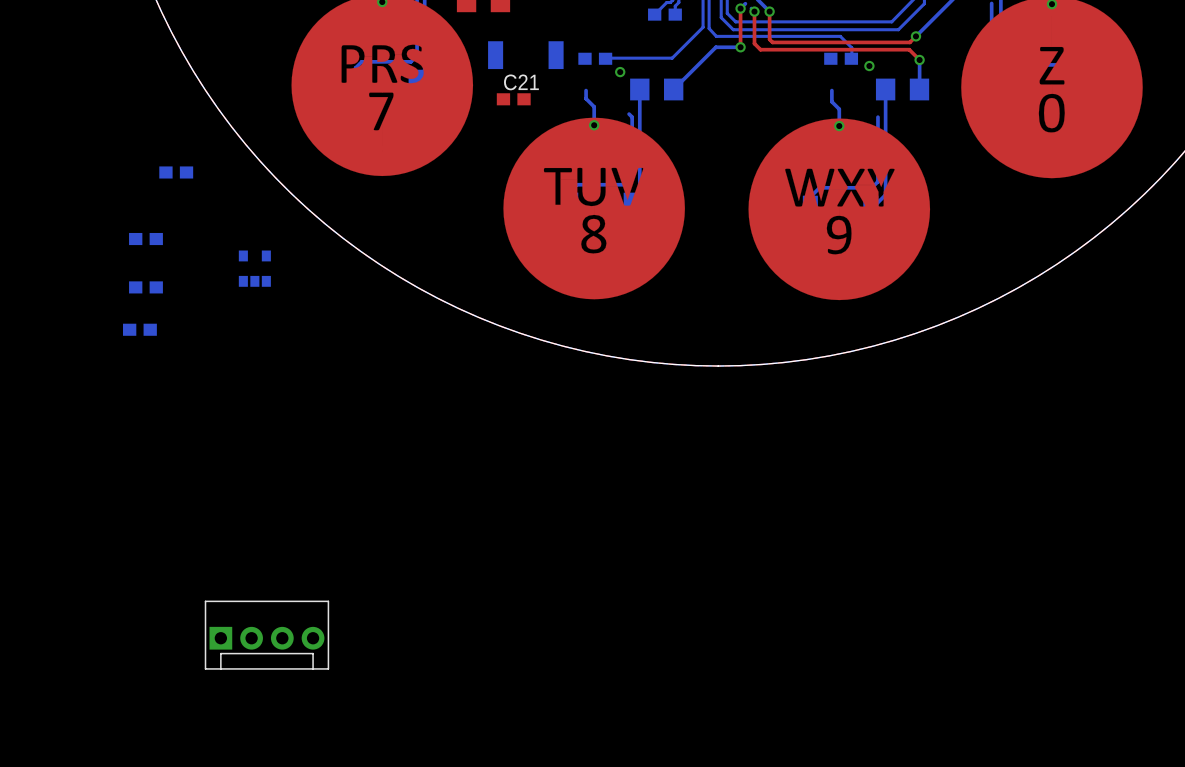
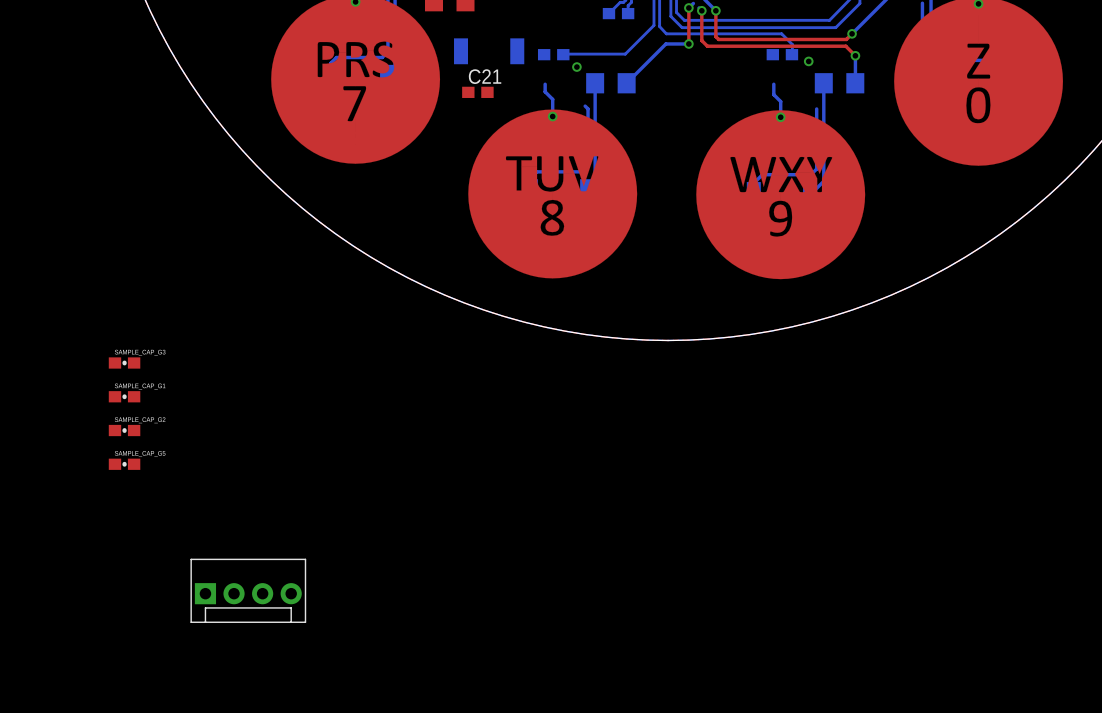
part side: bottom (176, 172) -> top (124, 362)
part side: bottom (145, 239) -> top (124, 396)
part: (254, 268) -> none
part side: bottom (145, 287) -> top (124, 430)
part side: bottom (139, 329) -> top (124, 464)

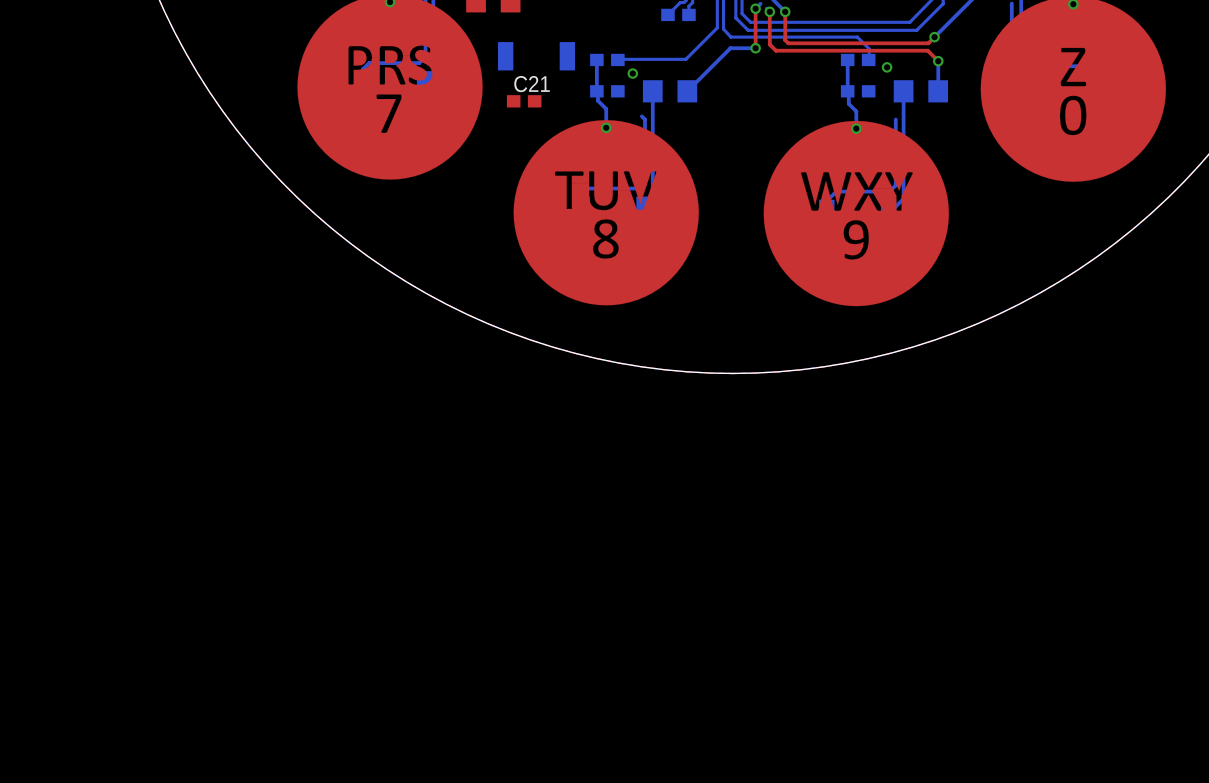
bottom track: none -> (596, 59) (597, 92)
bottom track: none -> (847, 59) (848, 92)
part: none -> (607, 91)
part: none -> (858, 91)
part: (124, 362) -> none
part: (124, 396) -> none
part: (124, 430) -> none
part: (124, 464) -> none
part: (248, 590) -> none

